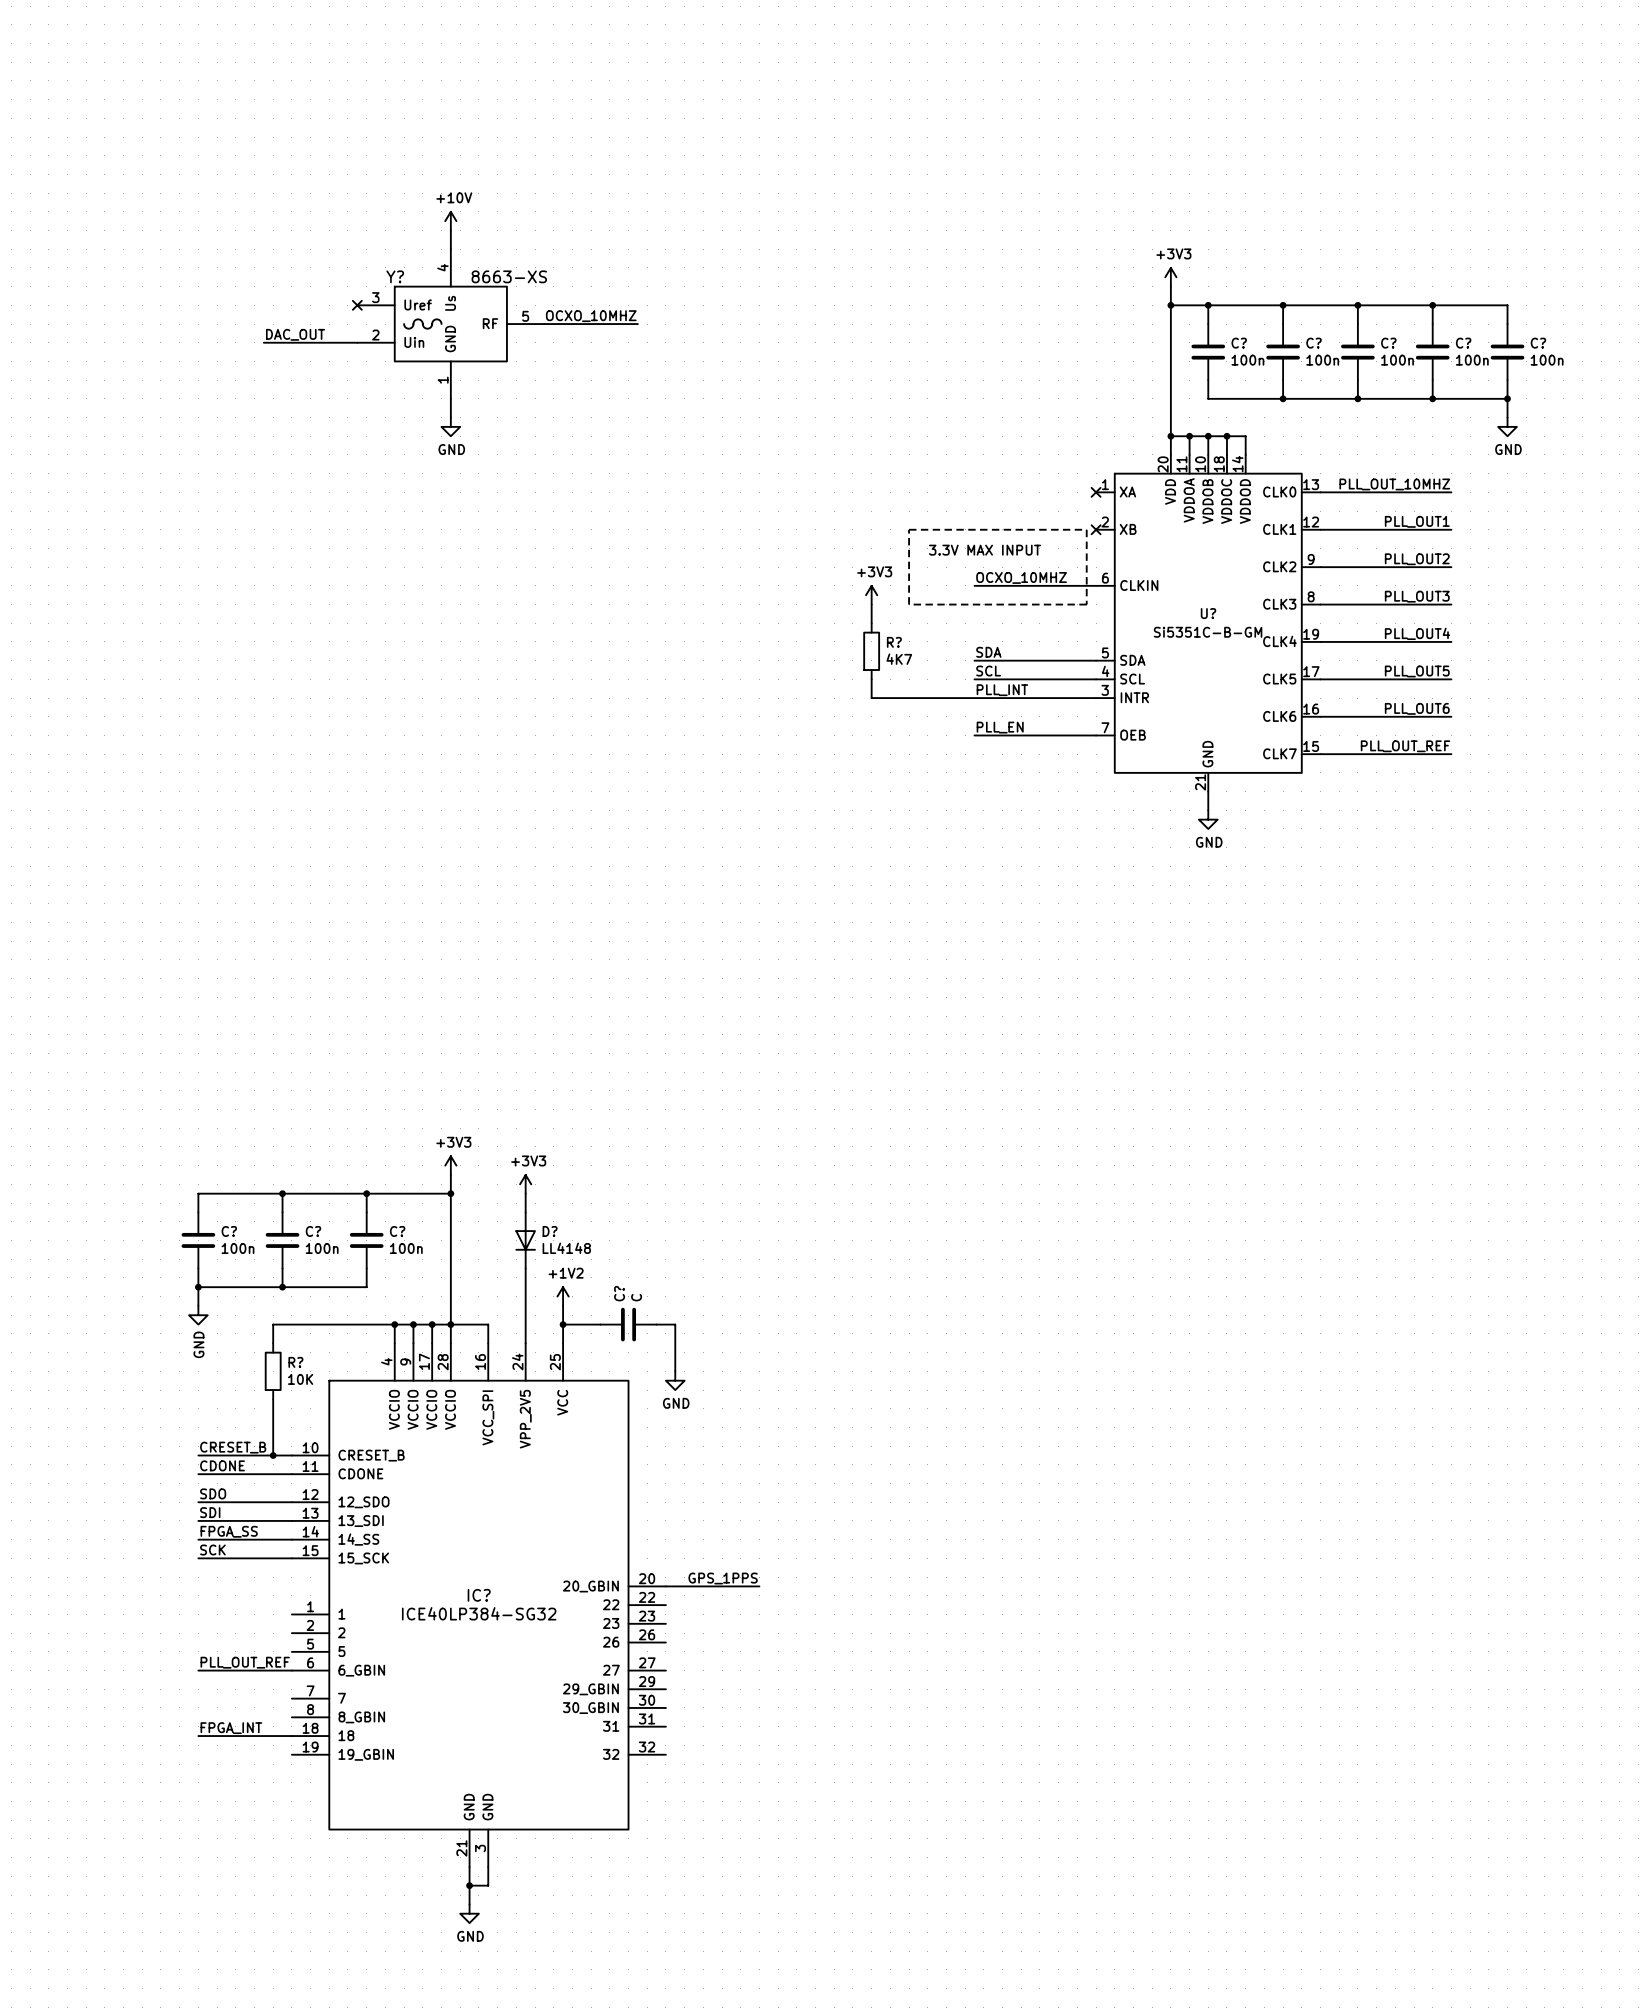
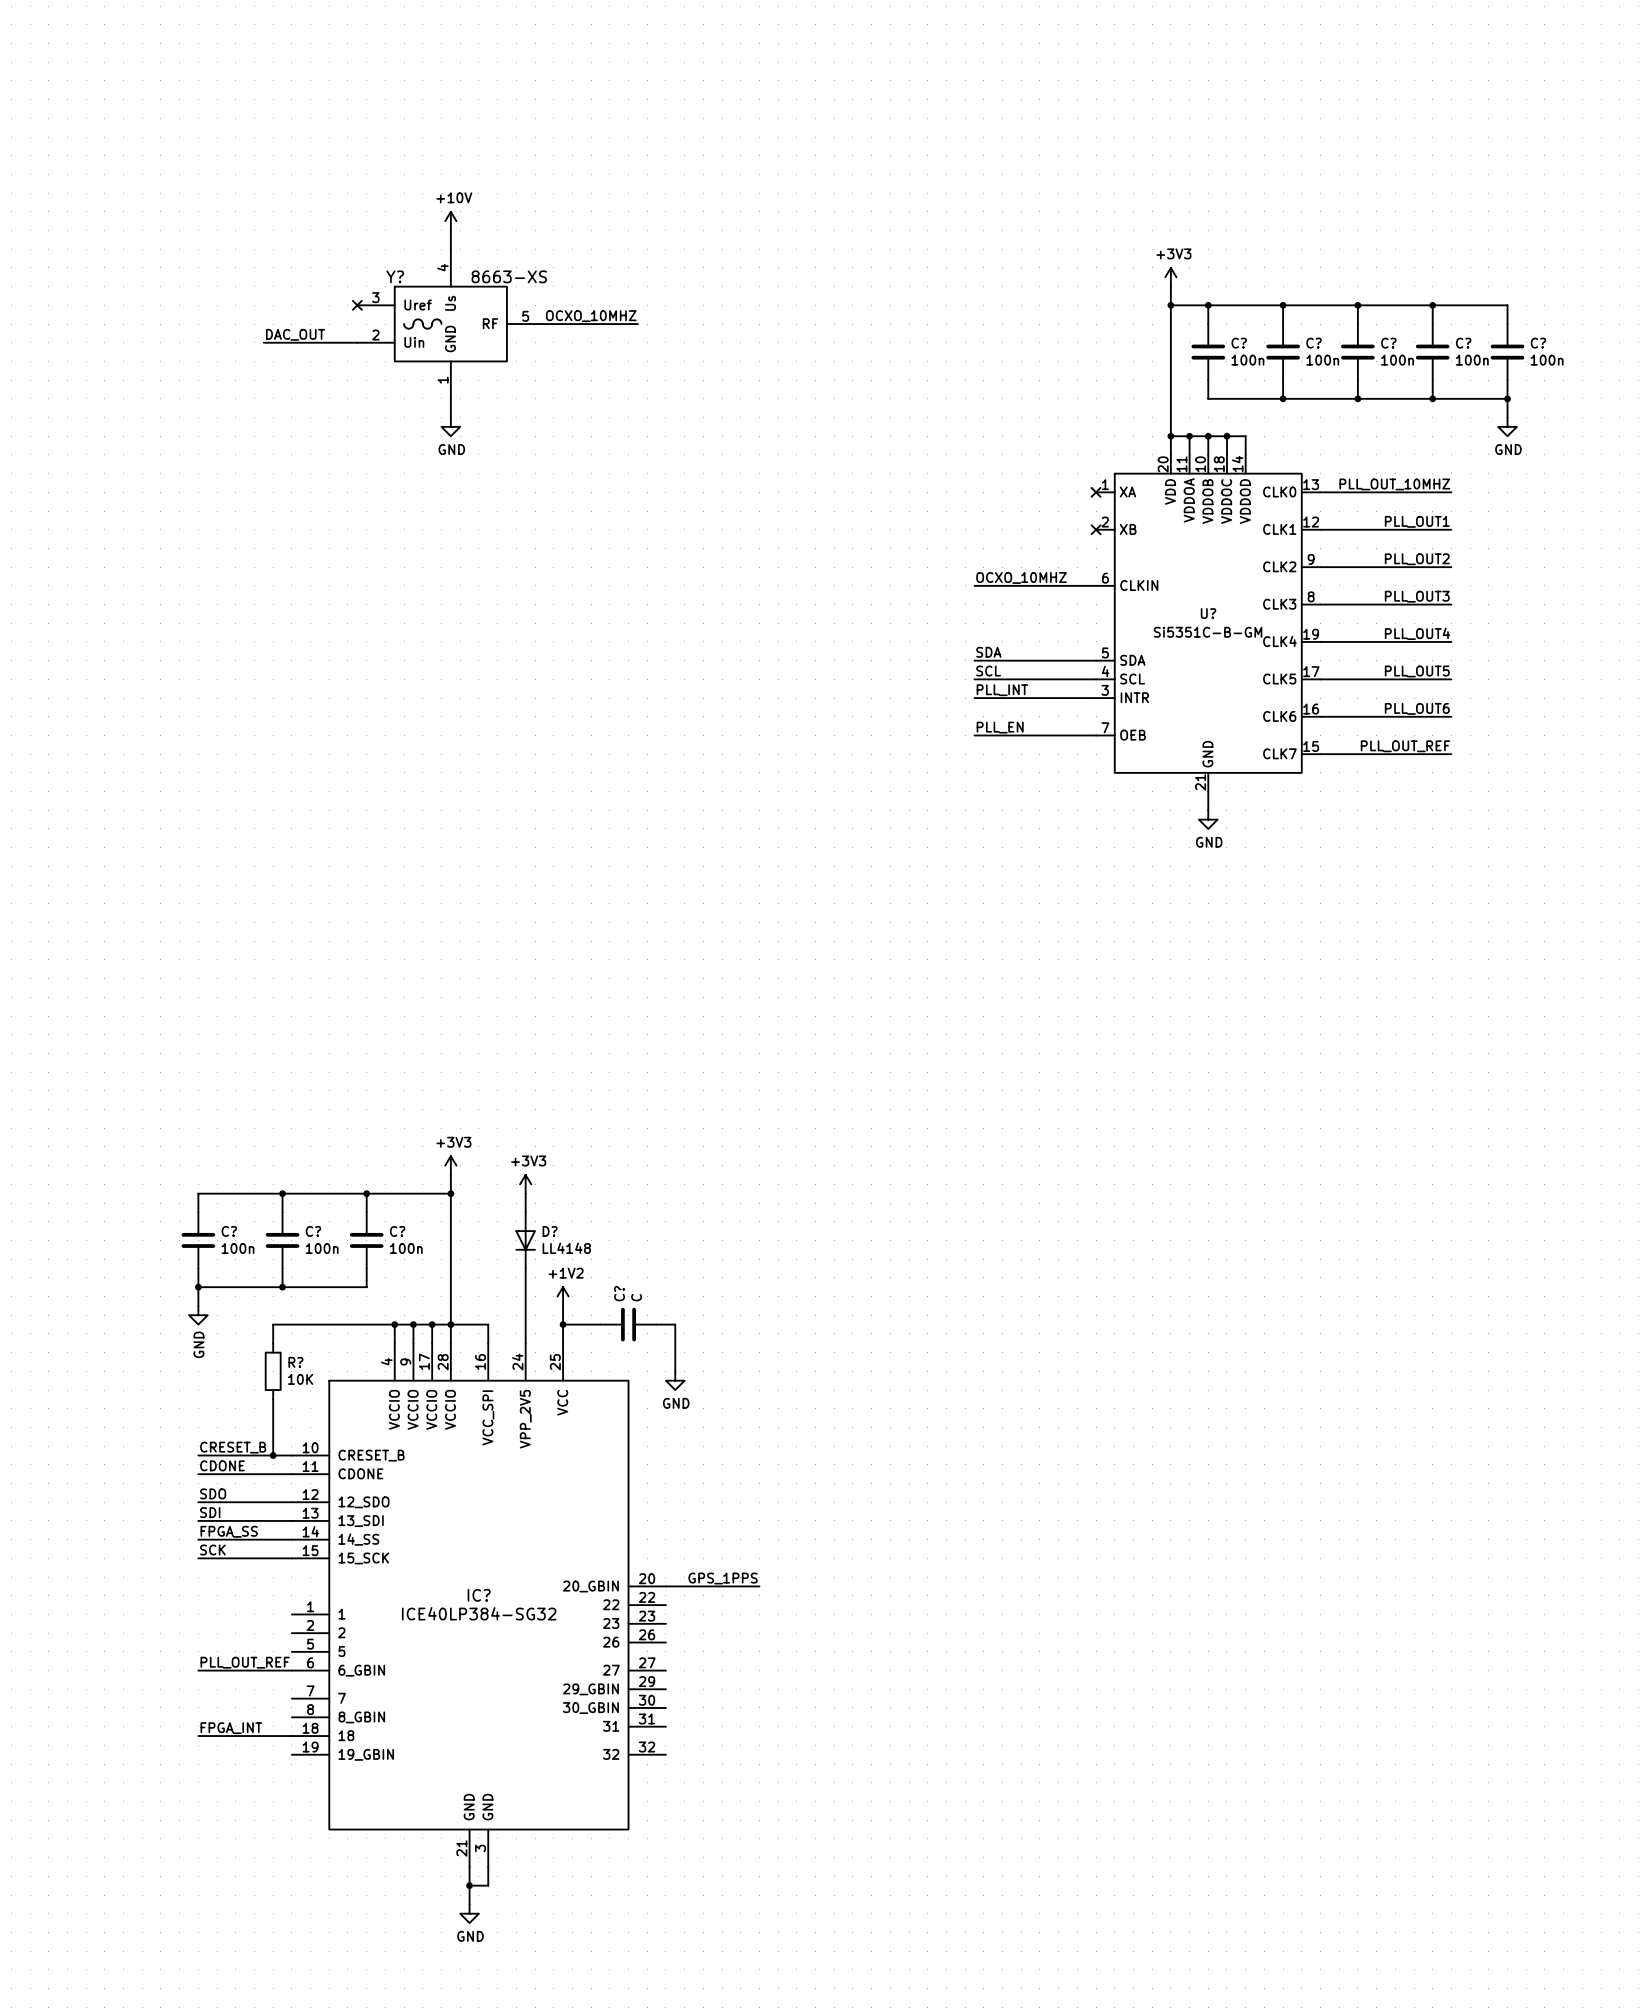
line: (909, 529) (1086, 529) (1086, 604) (909, 604) (909, 529) -> none
text: 3.3V MAX INPUT (985, 550) -> none
power symbol: +3V3 (871, 595) -> none
wire: (871, 604) (871, 623) -> none
R?: 4K7 (871, 651) -> none
wire: (871, 679) (871, 698) (974, 698) -> none

